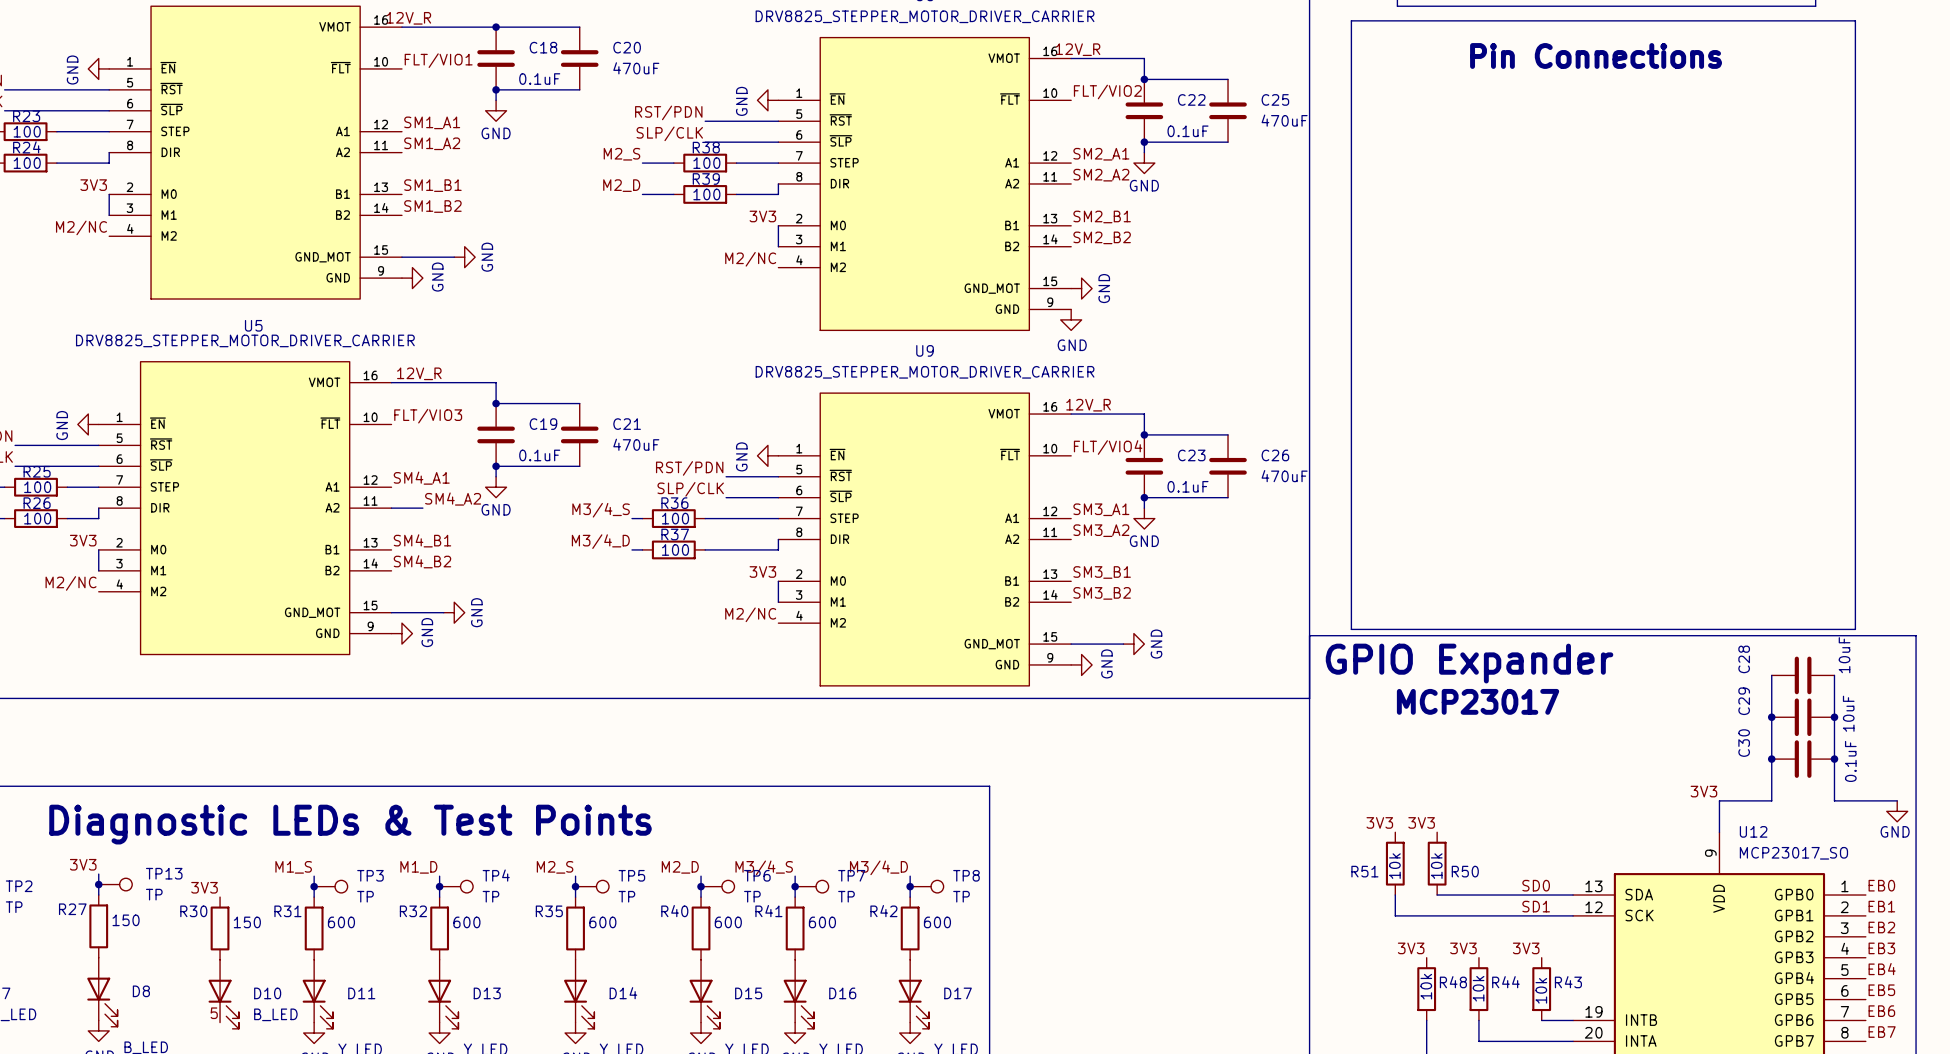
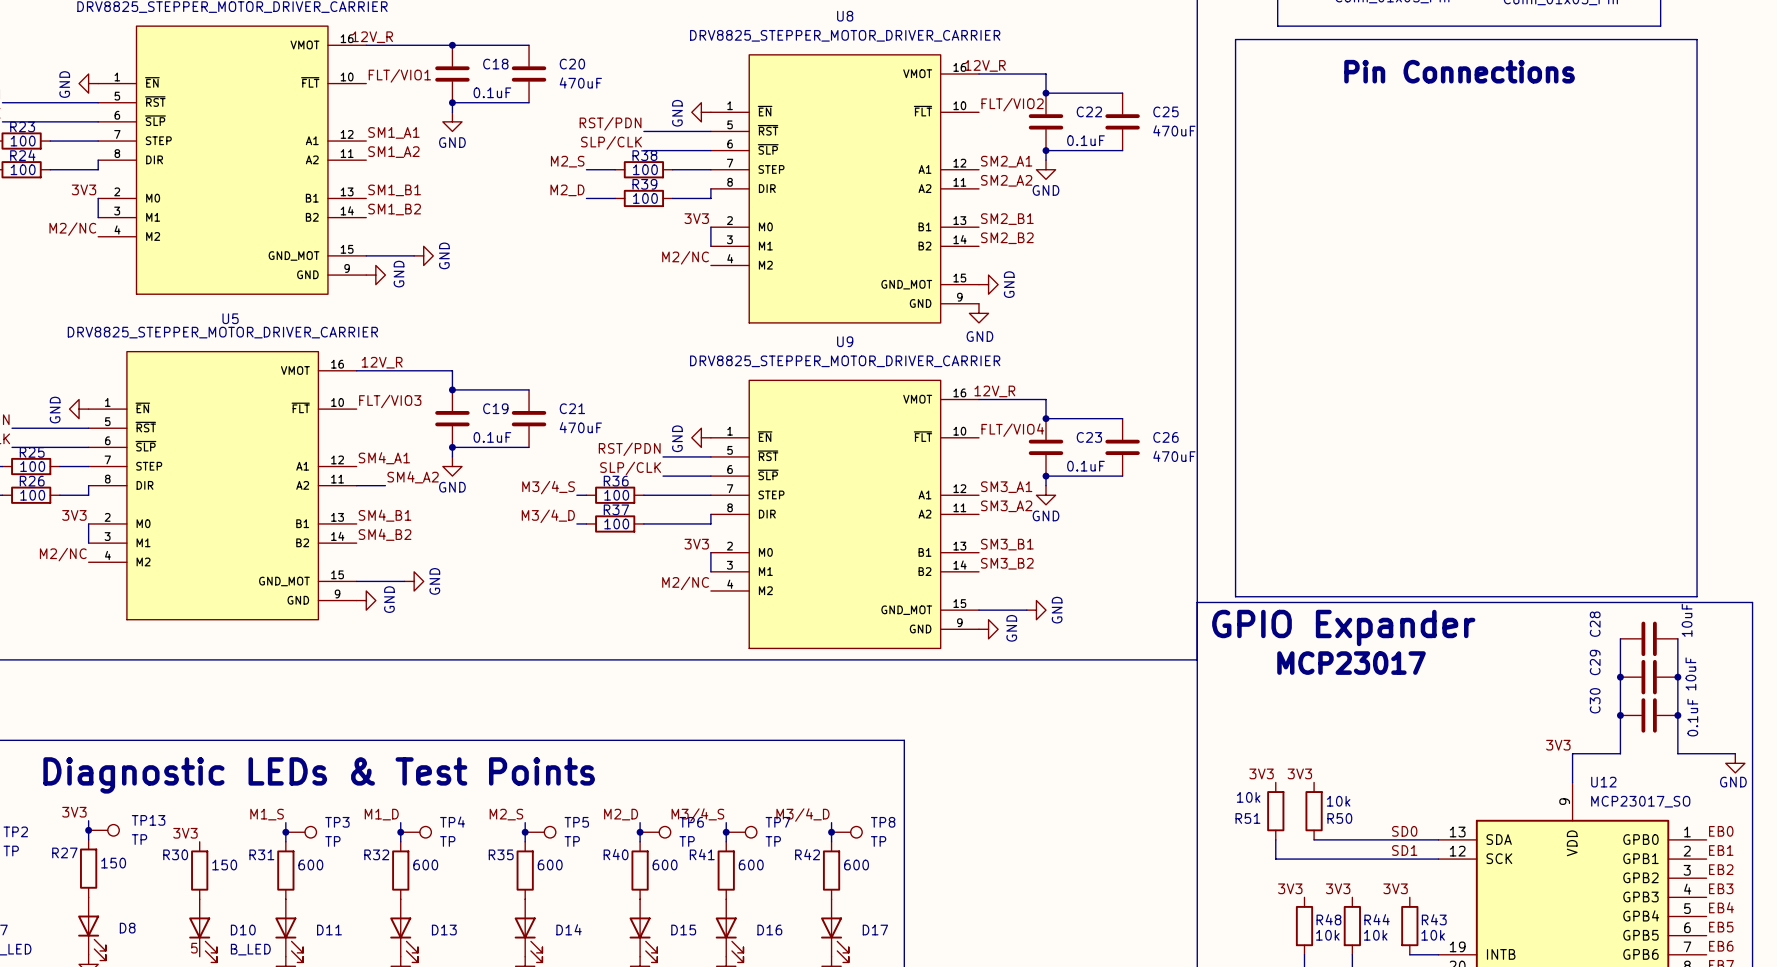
R51 value rotation: 0° (1394, 866) -> 90° clockwise (1248, 797)
R51 value position: 10k (1394, 866) -> 10k (1248, 797)
R50 value rotation: 0° (1436, 866) -> 90° clockwise (1338, 801)
R48 value rotation: 0° (1426, 986) -> 90° clockwise (1327, 935)
R44 value rotation: 0° (1478, 988) -> 90° clockwise (1375, 935)
R43 value rotation: 0° (1541, 990) -> 90° clockwise (1433, 935)

